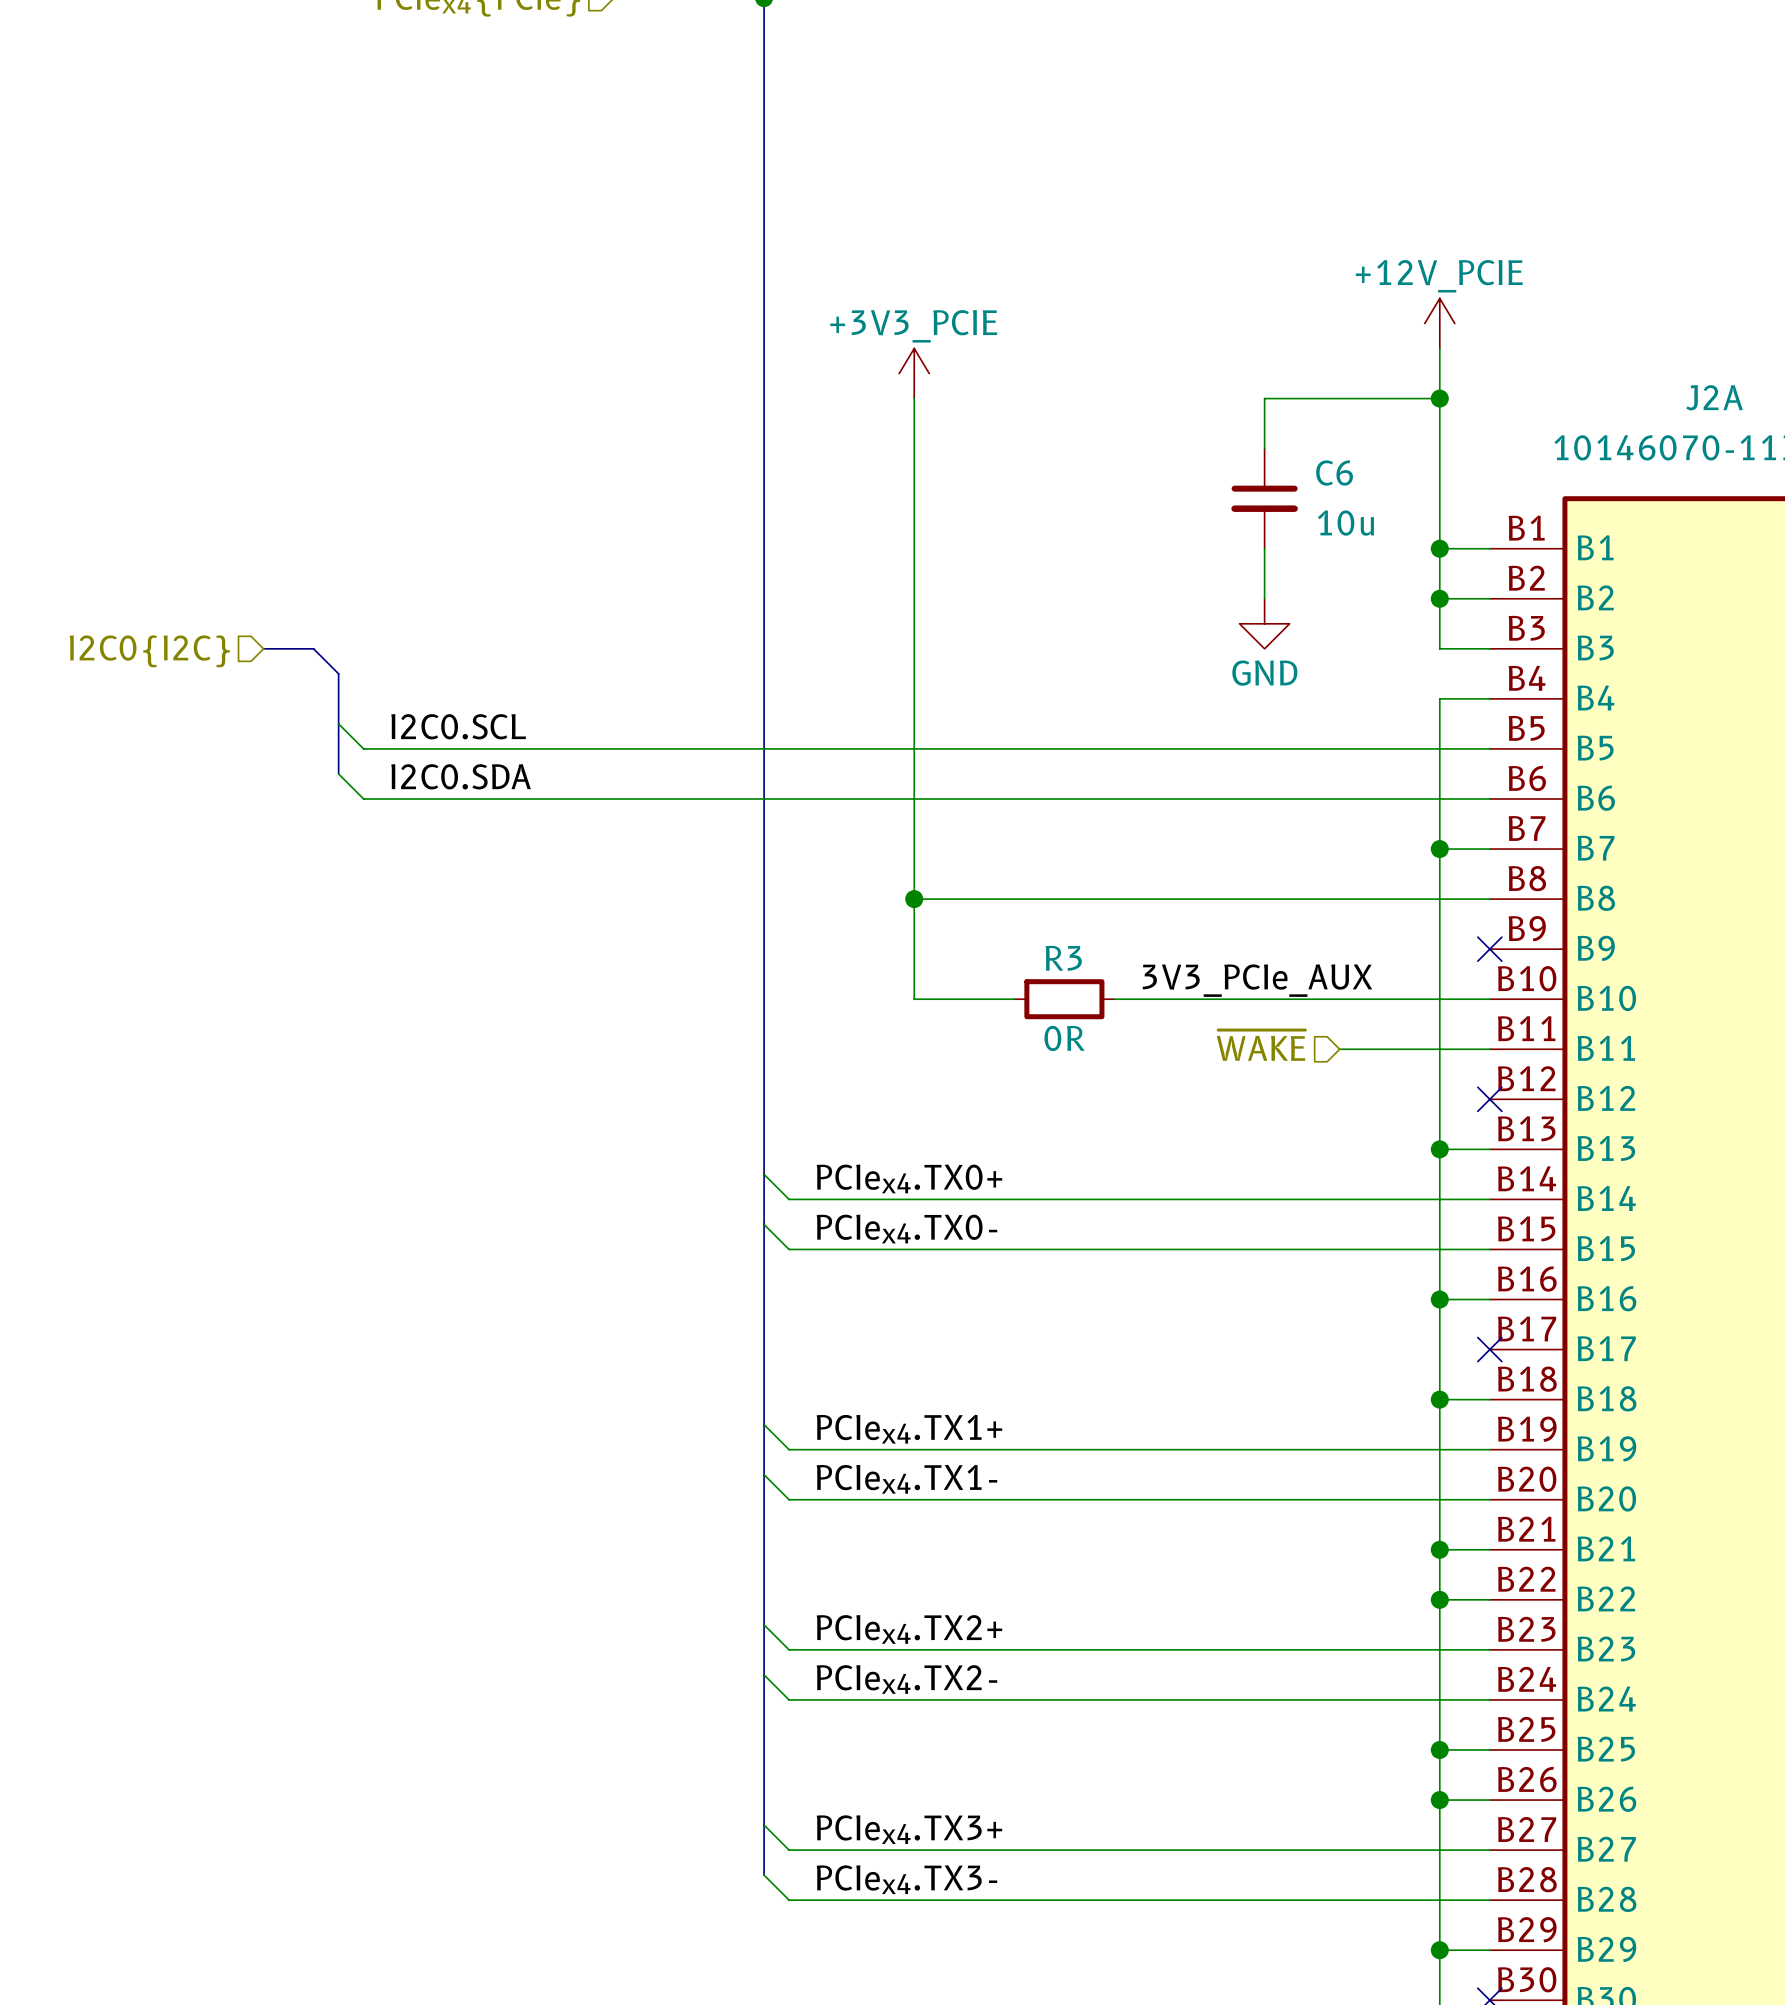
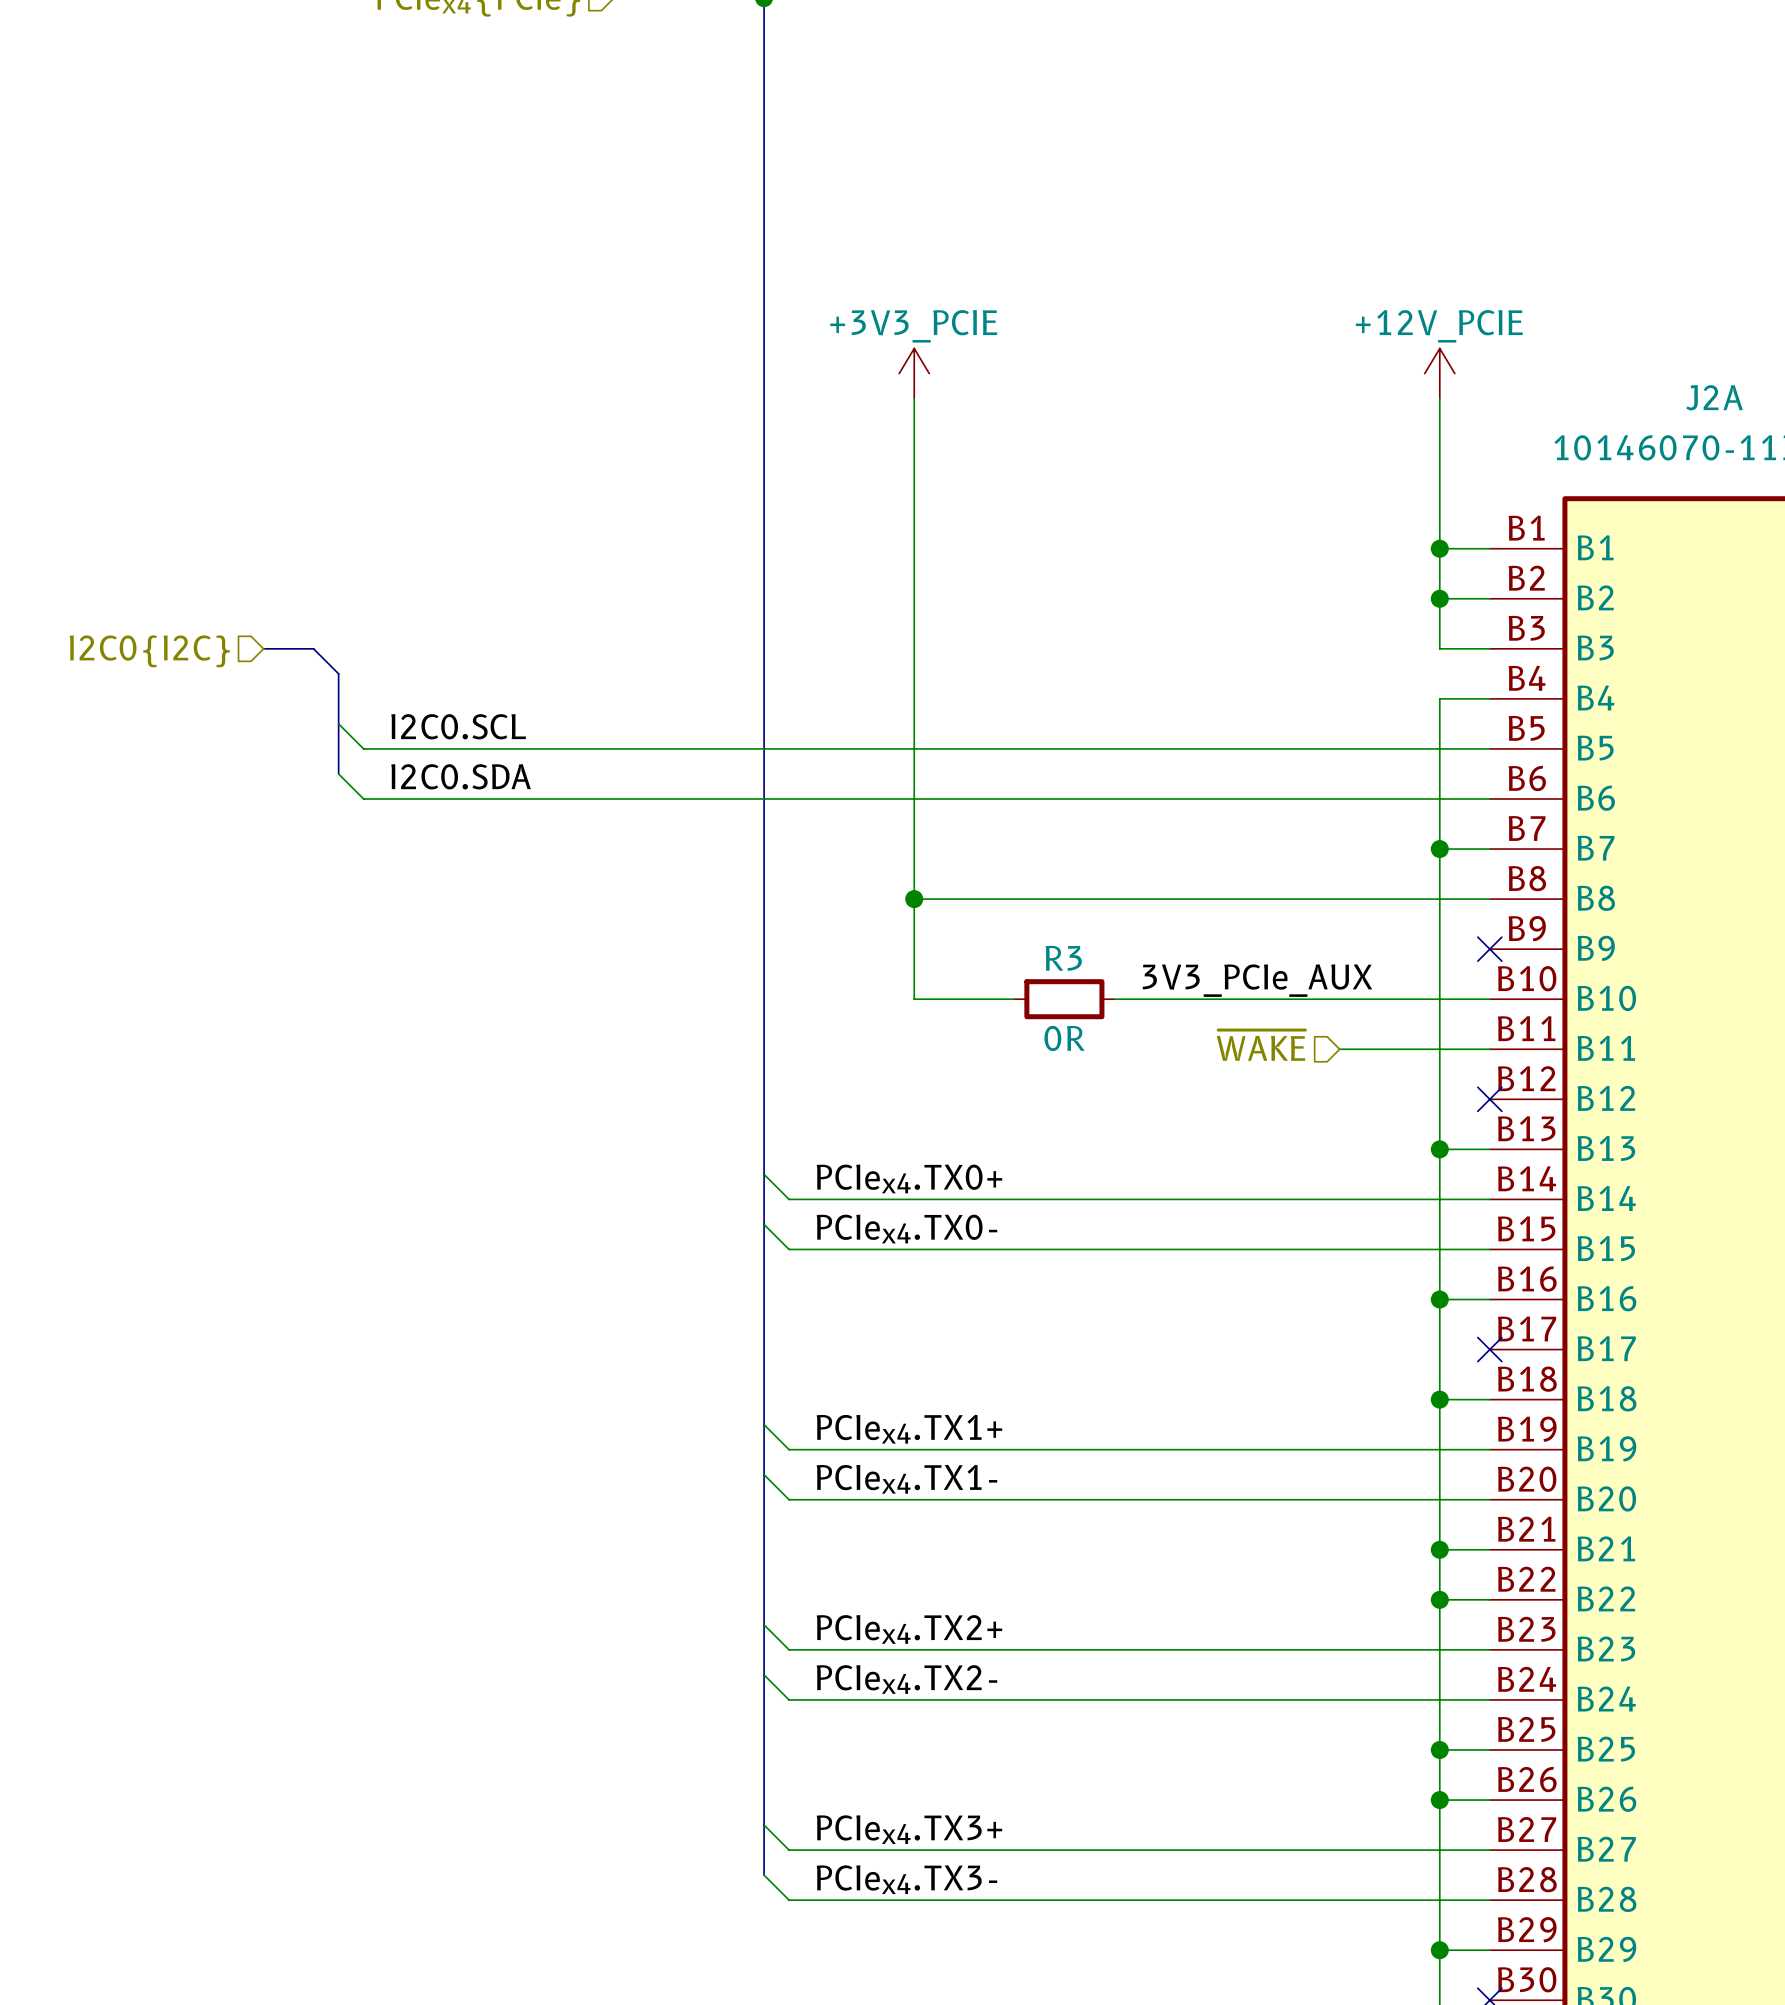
power symbol position: +12V_PCIE (1439, 323) -> +12V_PCIE (1439, 373)
wire: (1439, 348) (1439, 398) (1264, 398) (1264, 448) -> none
junction: (1439, 398) -> none
C6: (1264, 498) -> none
wire: (1264, 548) (1264, 598) -> none
power symbol: GND (1264, 623) -> none

